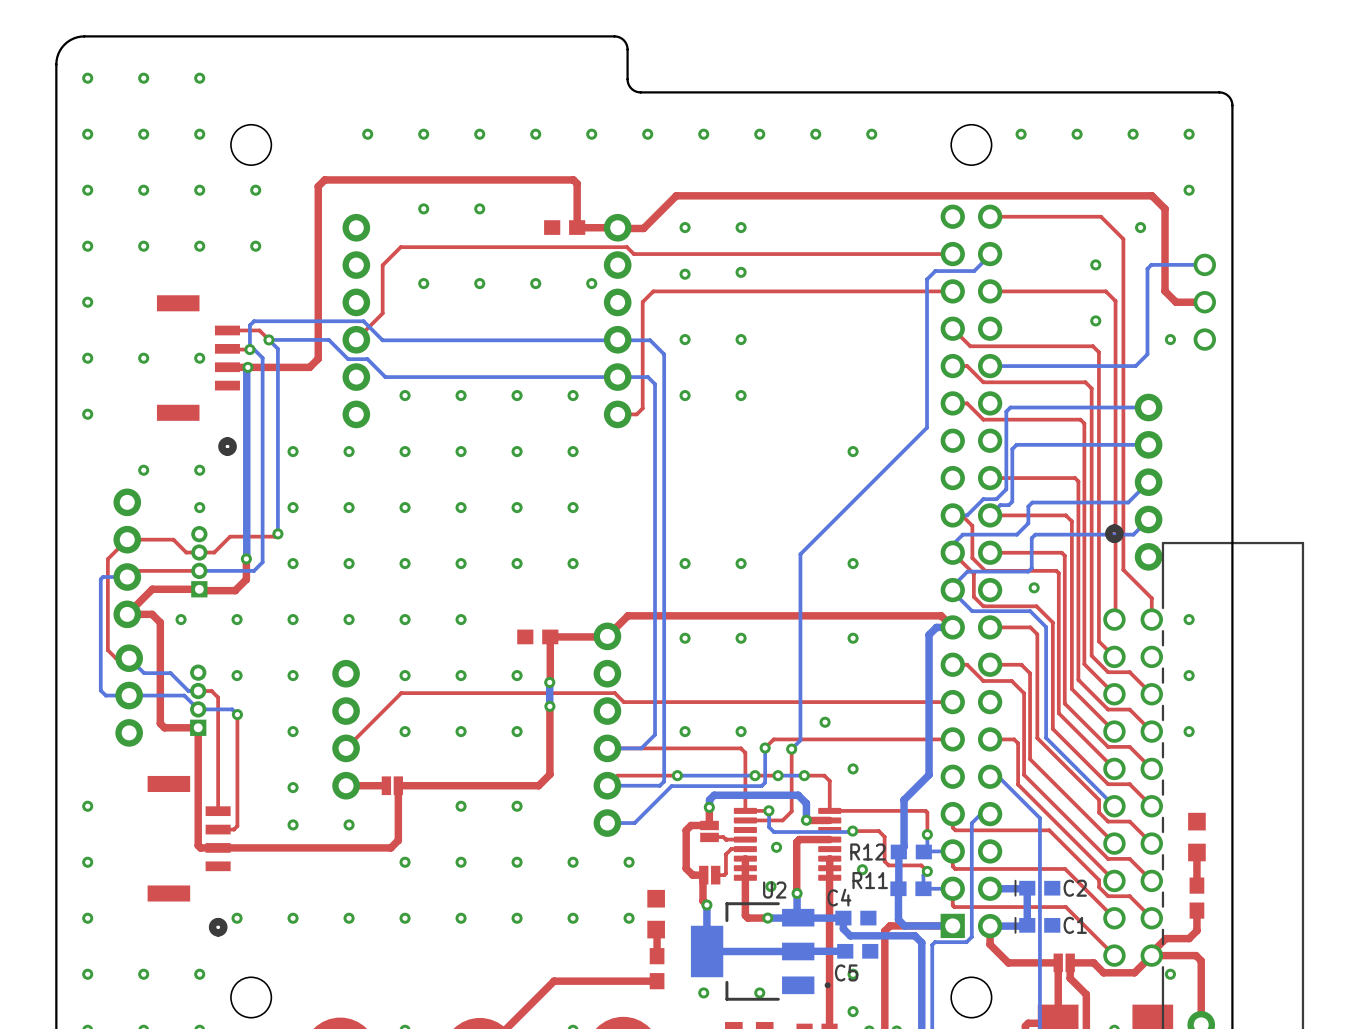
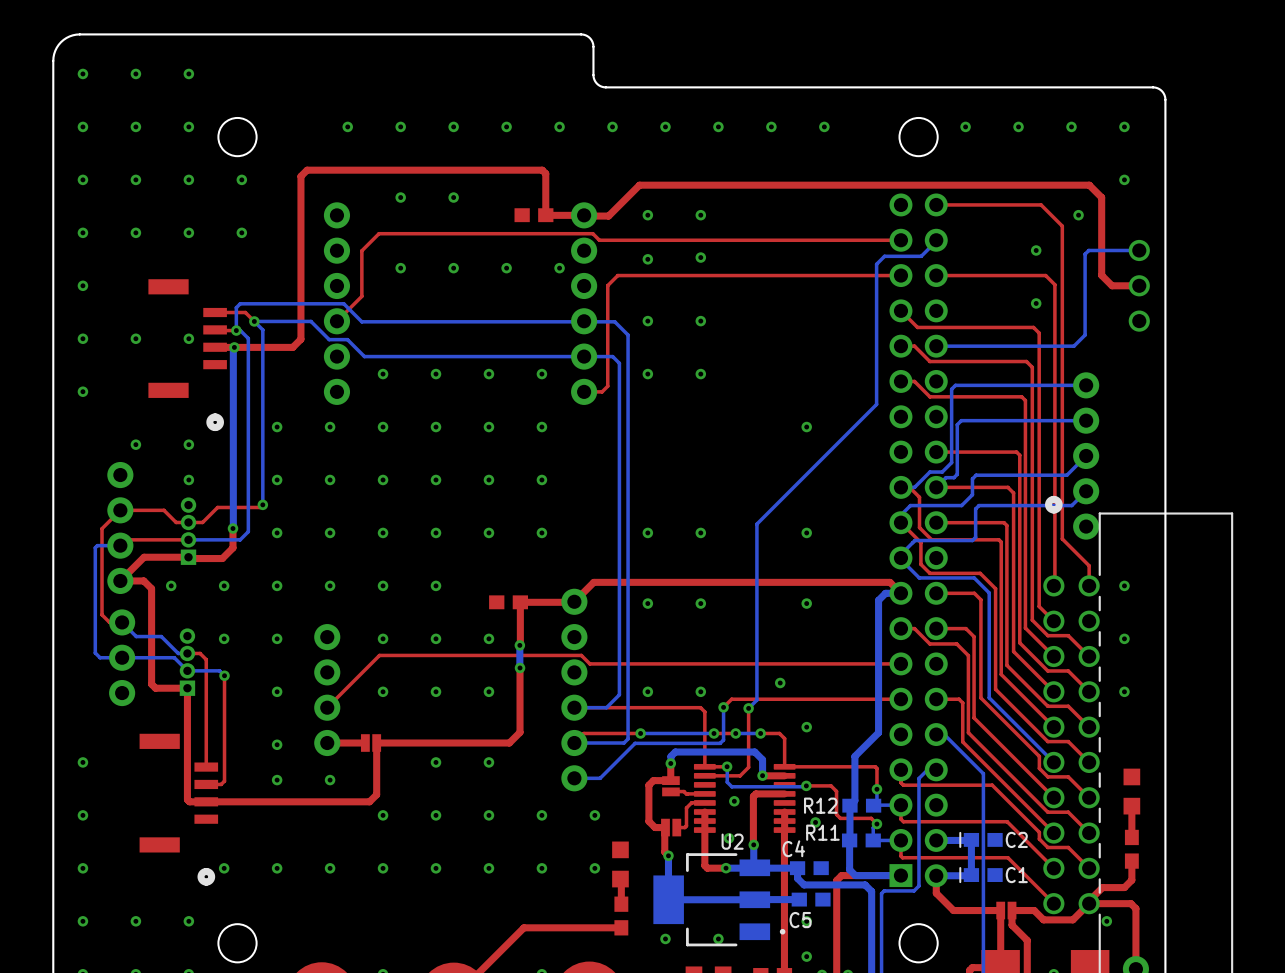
via: (1170, 339) -> none
via: (1034, 587) -> none

